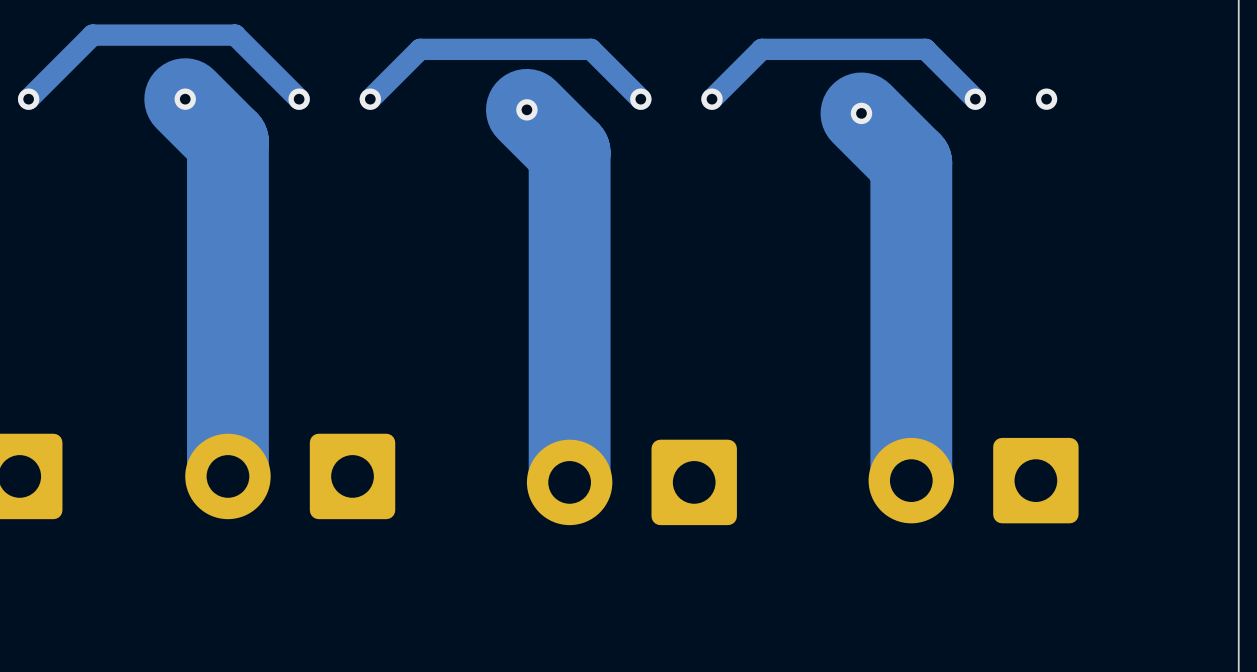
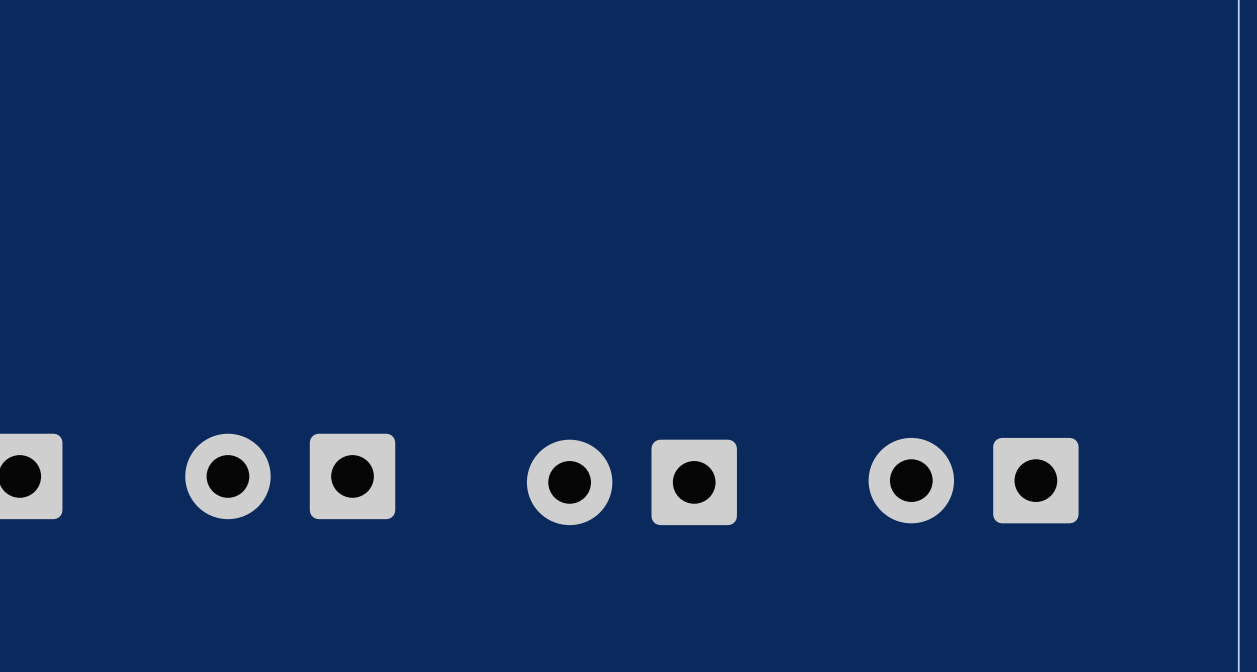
via: (28, 99) -> none
track: (185, 99) (227, 141) (227, 476) -> none
via: (185, 99) -> none
track: (299, 99) (235, 35) (92, 35) (28, 99) -> none
via: (299, 99) -> none
via: (370, 99) -> none
track: (640, 99) (590, 49) (420, 49) (370, 99) -> none
via: (640, 99) -> none
via: (712, 99) -> none
track: (975, 99) (925, 49) (761, 49) (712, 99) -> none
via: (975, 99) -> none
via: (1046, 99) -> none
track: (526, 109) (569, 152) (569, 482) -> none
via: (526, 109) -> none
track: (861, 113) (911, 163) (911, 480) -> none
via: (861, 113) -> none

